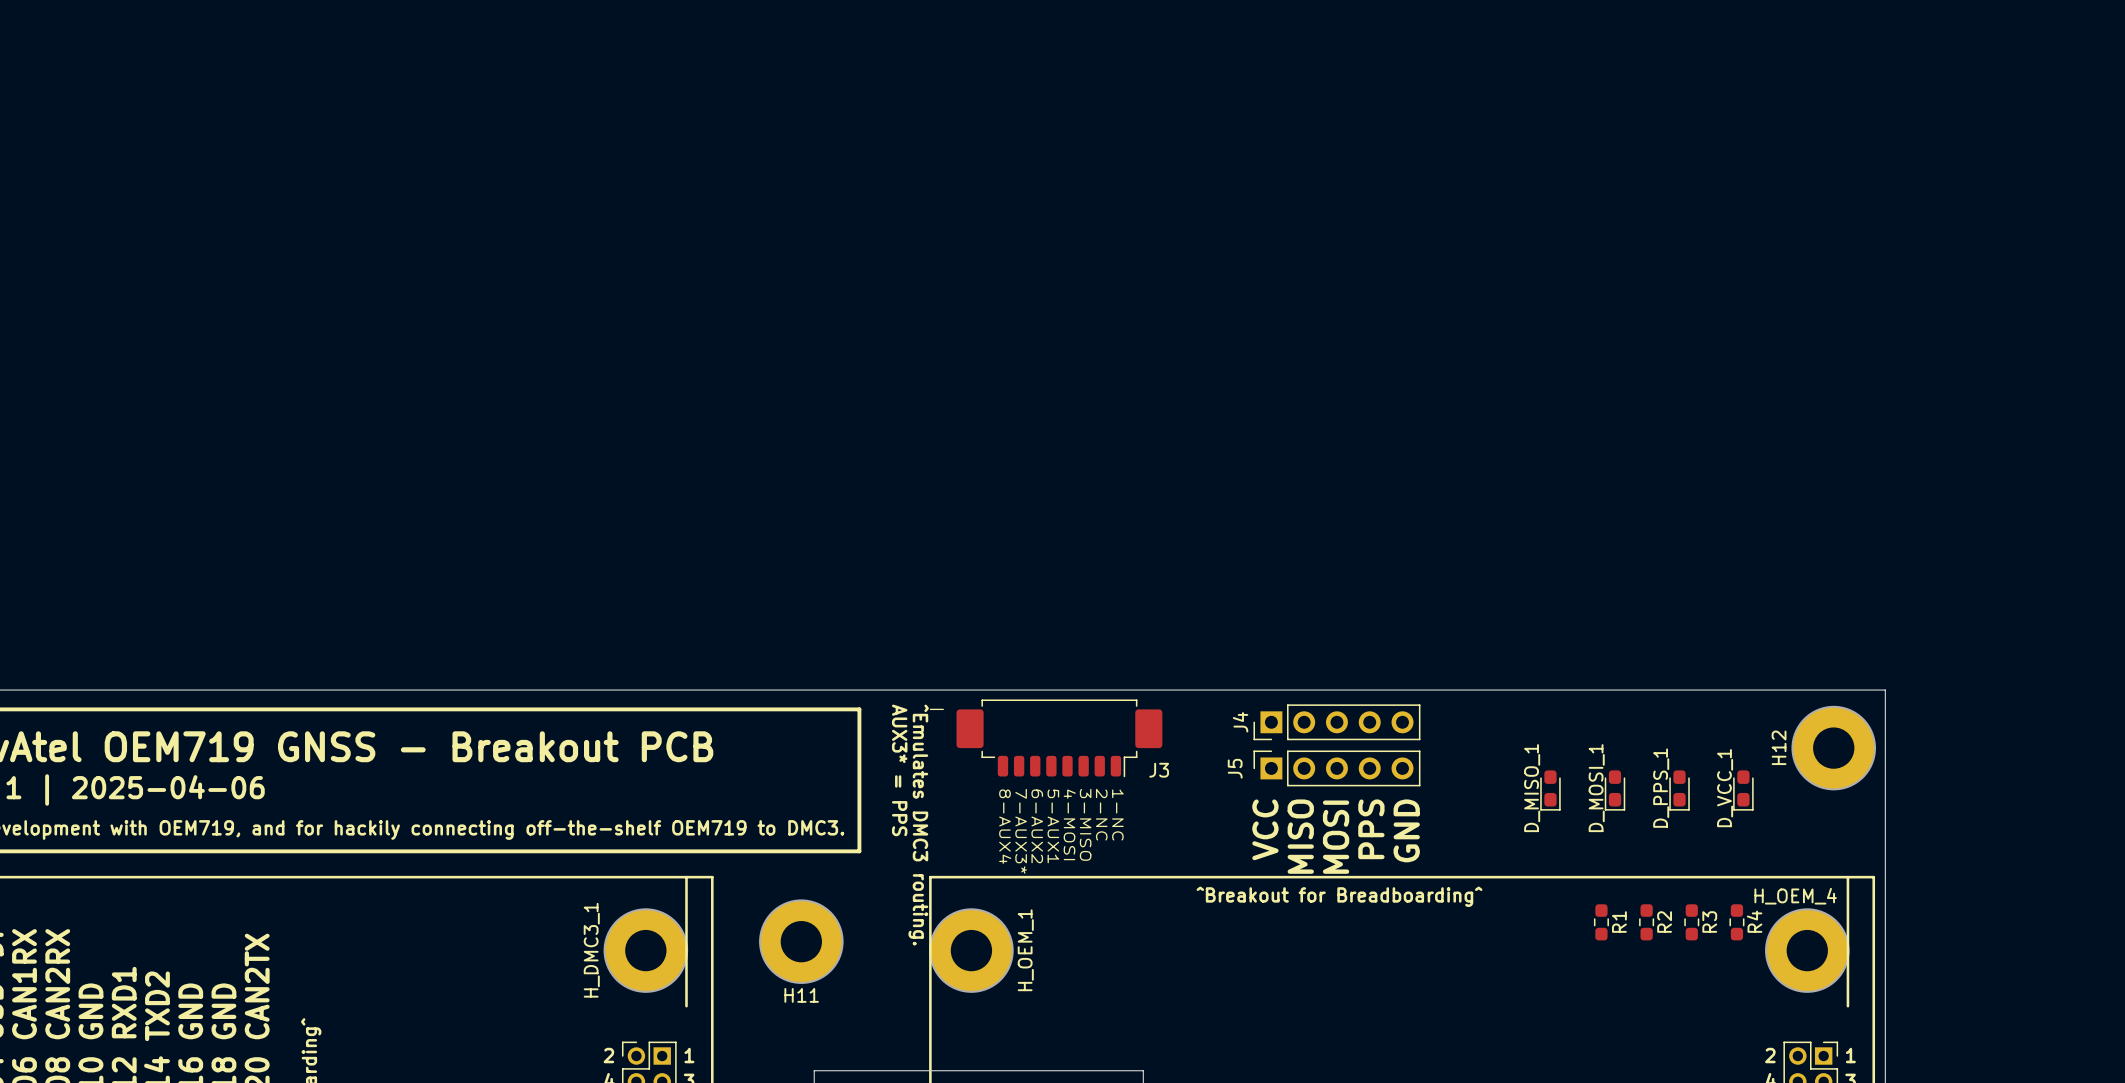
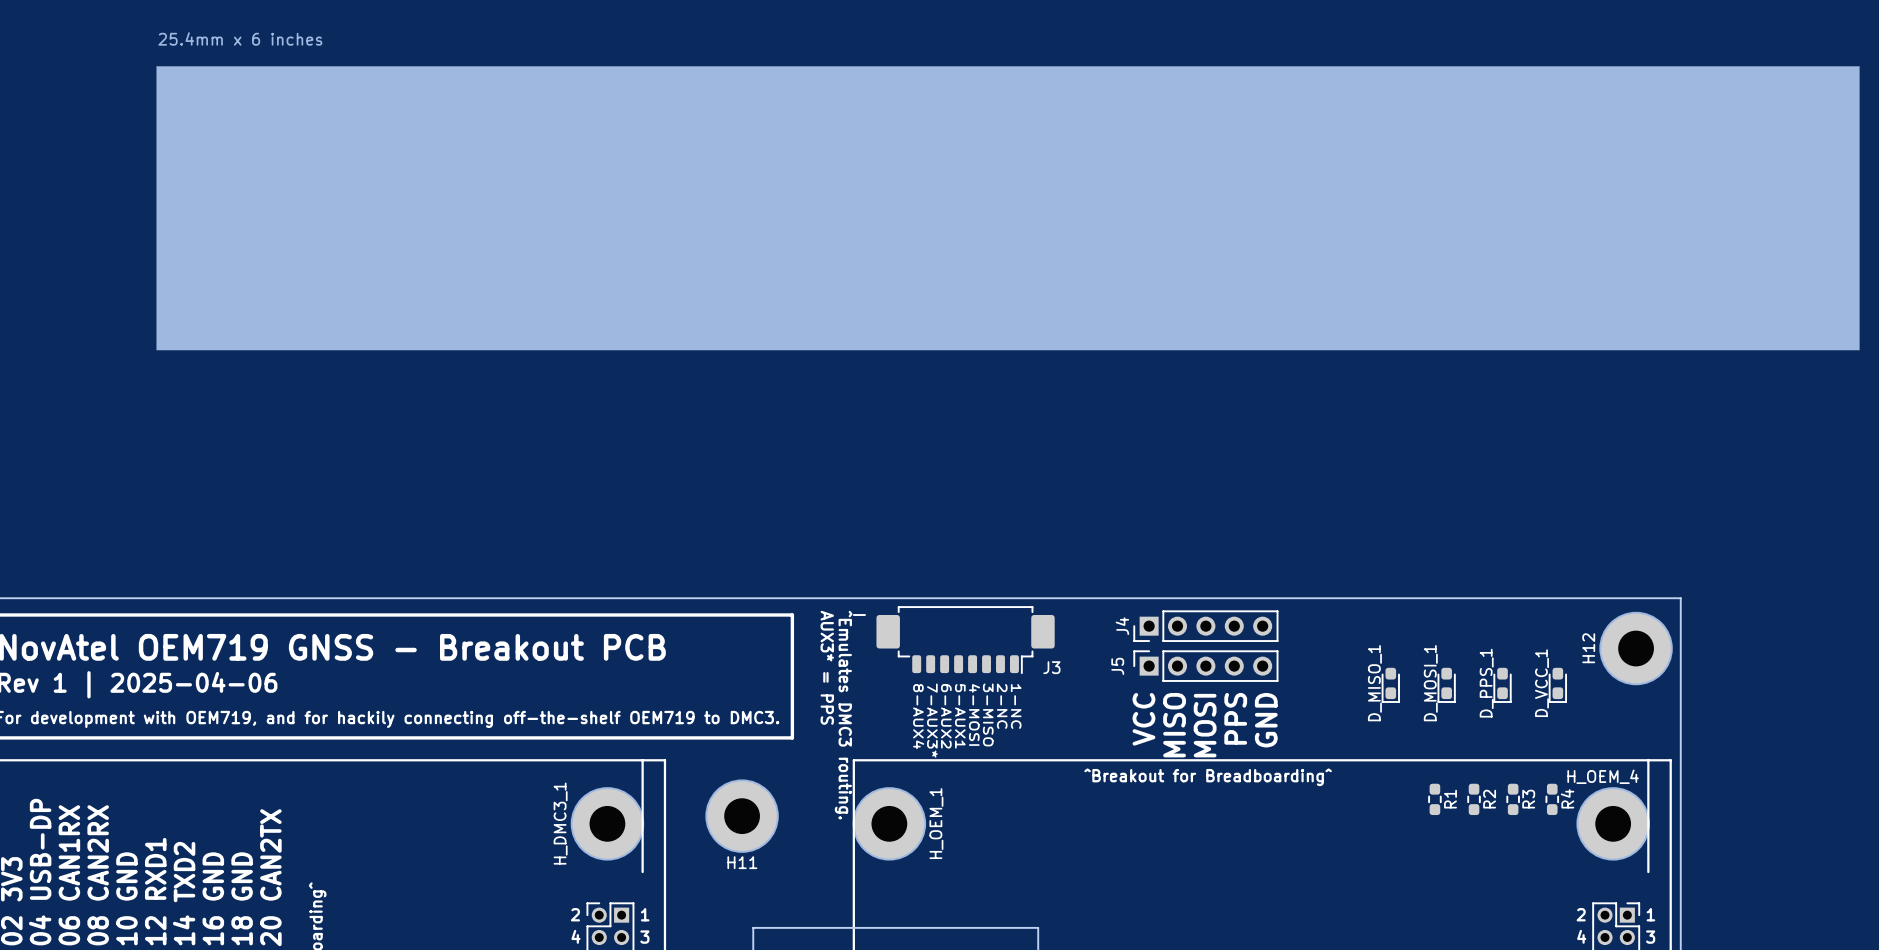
text: none -> 25.4mm x 6 inches (240, 38)
drawing: none -> [156, 66, 1860, 351]

